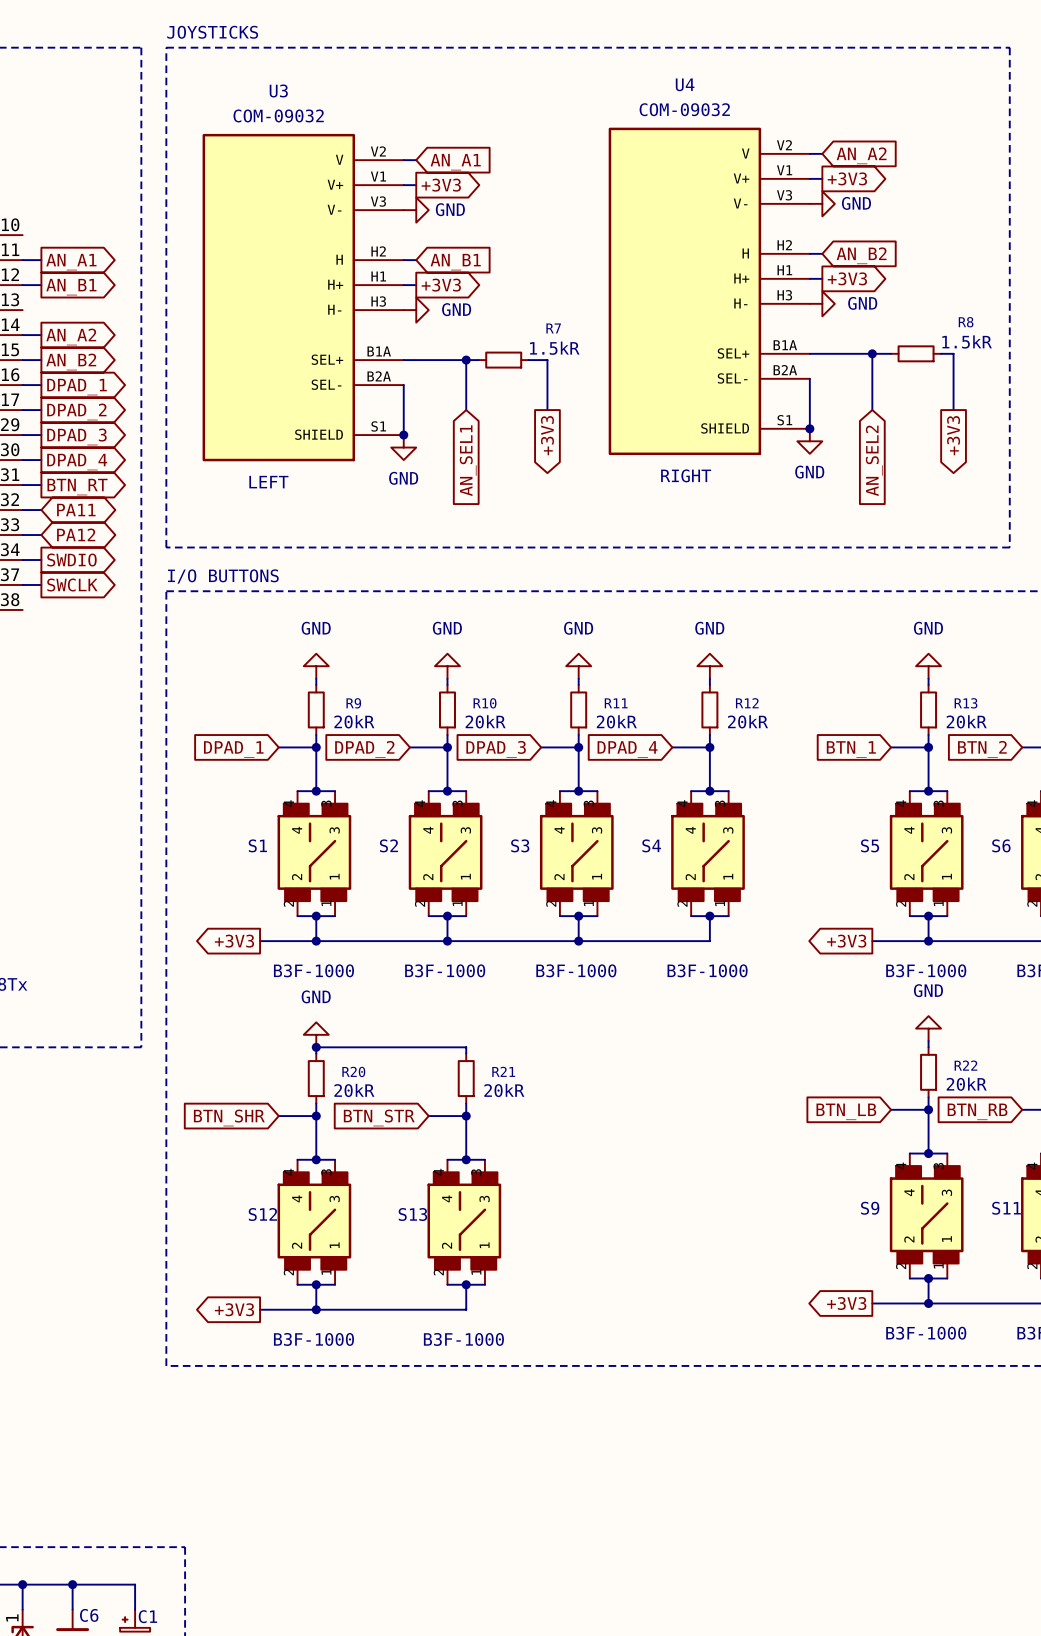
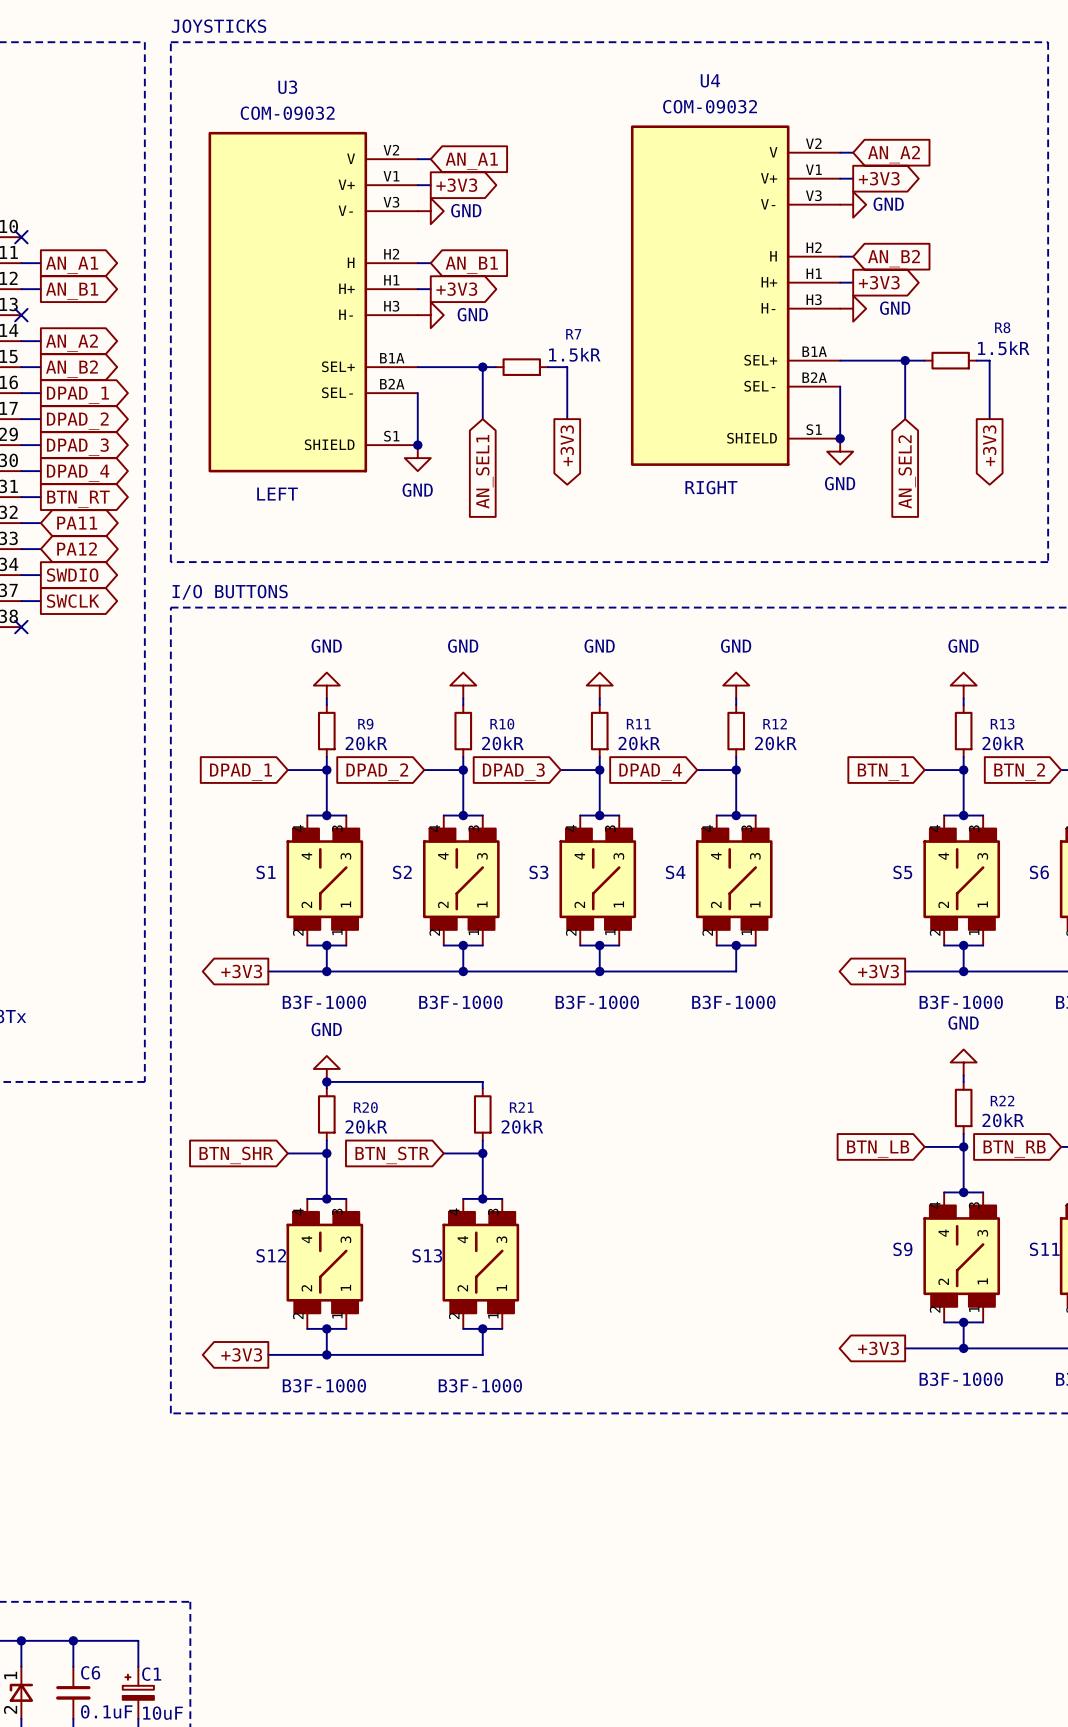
no-connect mark: none -> (21, 237)
no-connect mark: none -> (21, 315)
no-connect mark: none -> (21, 627)

